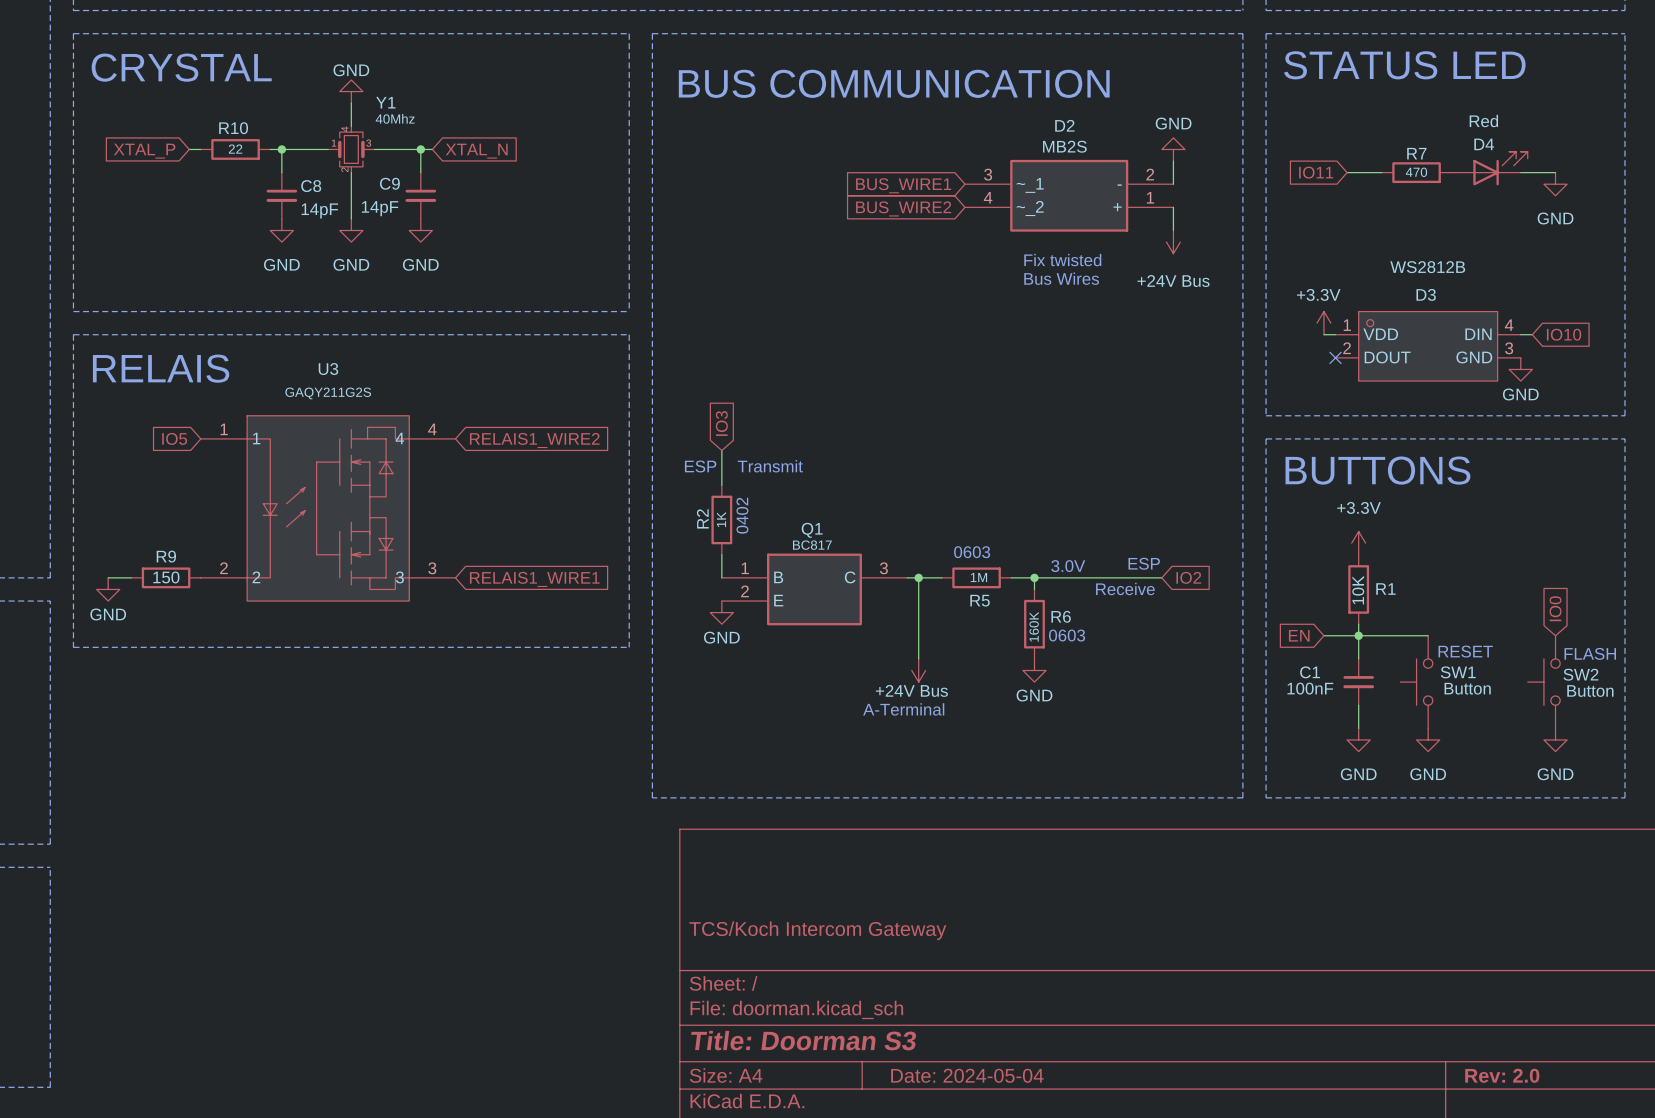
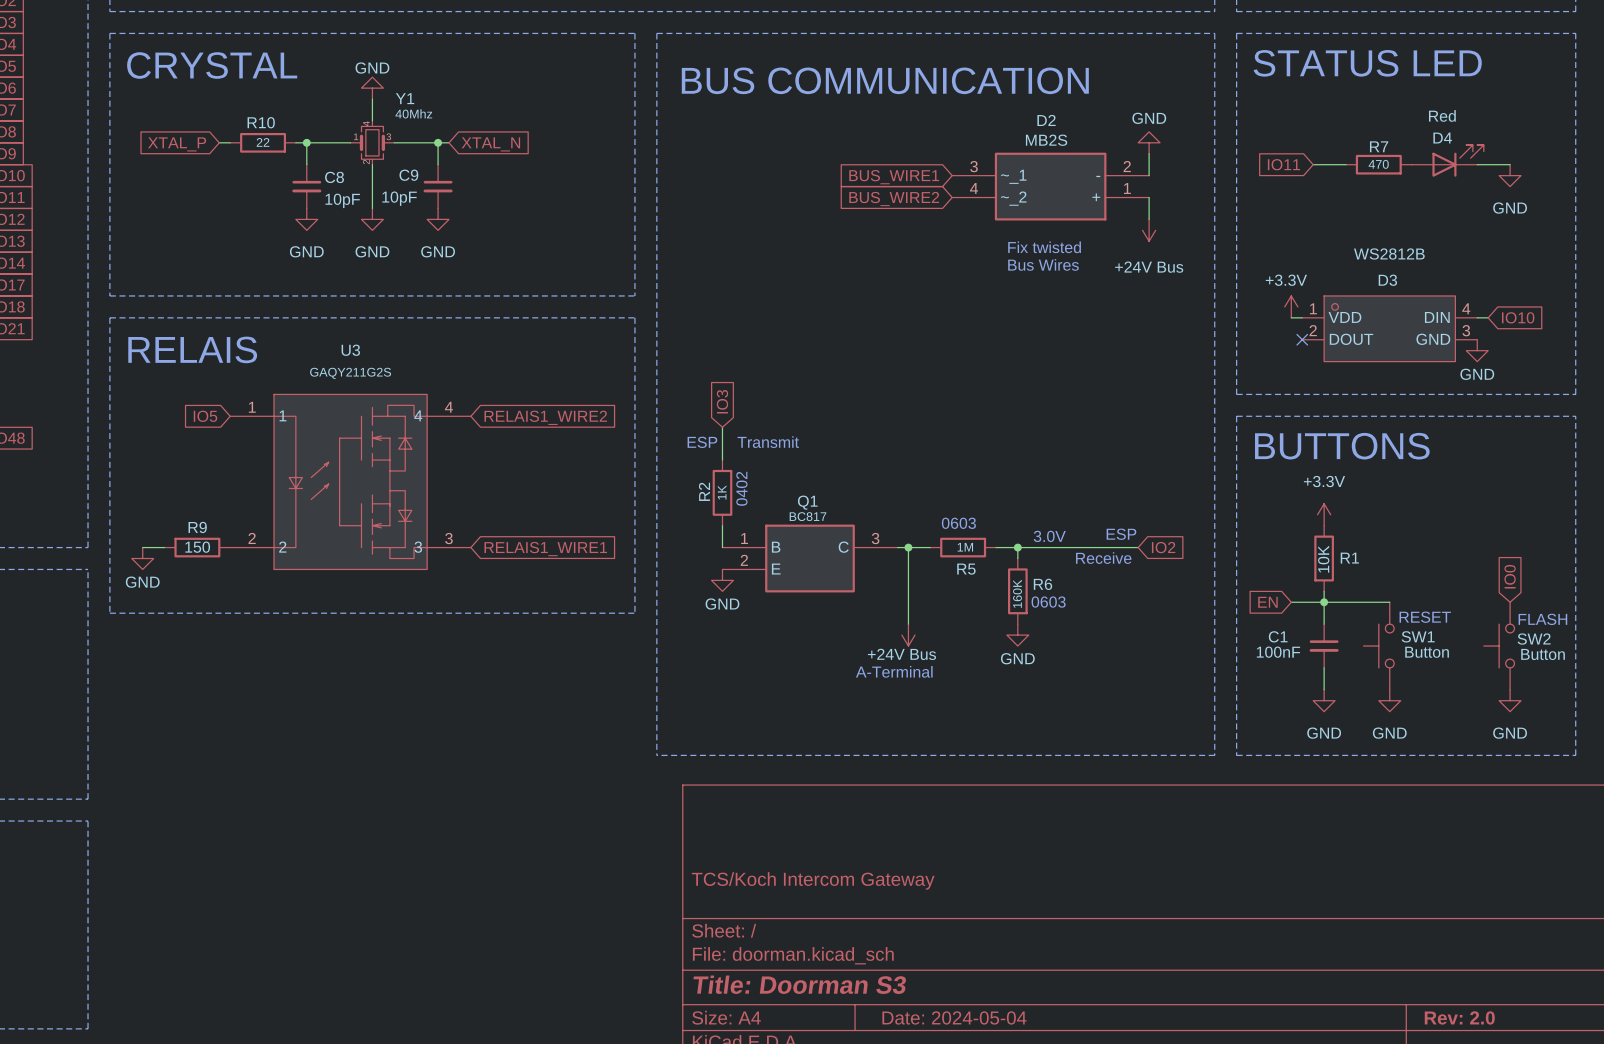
C9 value: 14pF (380, 208) -> 10pF (399, 198)
C8 value: 14pF (319, 210) -> 10pF (342, 200)

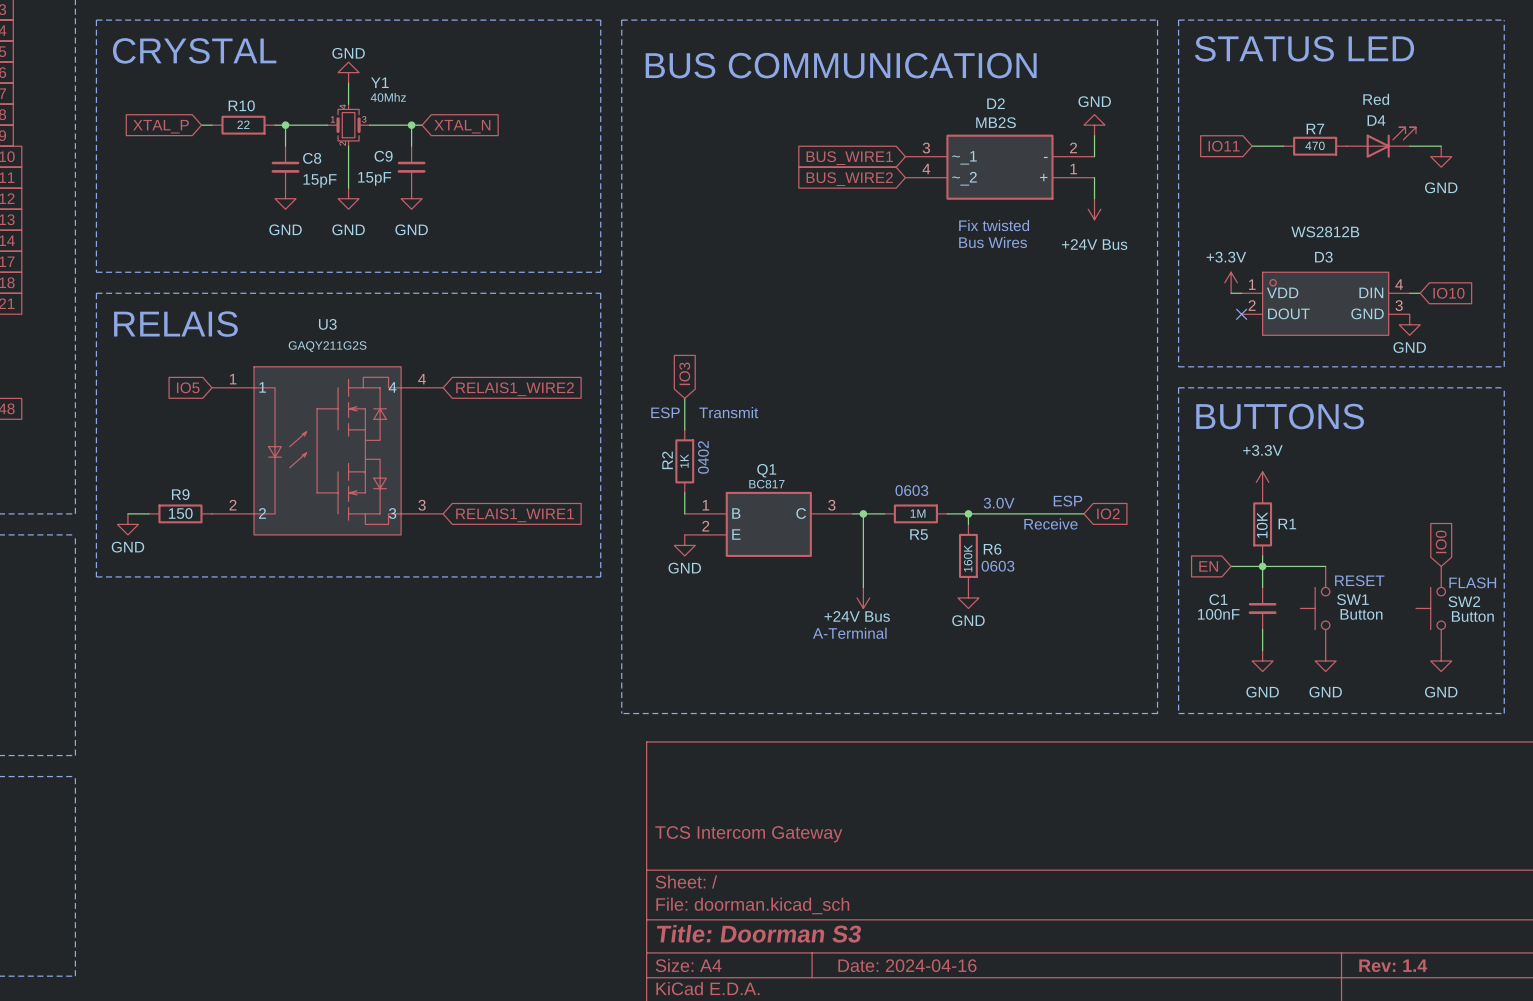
C9 value: 10pF (399, 198) -> 15pF (374, 178)
C8 value: 10pF (342, 200) -> 15pF (320, 181)
title block: TCS/Koch Intercom Gateway (813, 880) -> TCS Intercom Gateway (748, 834)
title block: Date: 2024-05-04 (954, 1017) -> Date: 2024-04-16 (907, 965)
title block: Rev: 2.0 (1459, 1017) -> Rev: 1.4 (1393, 965)

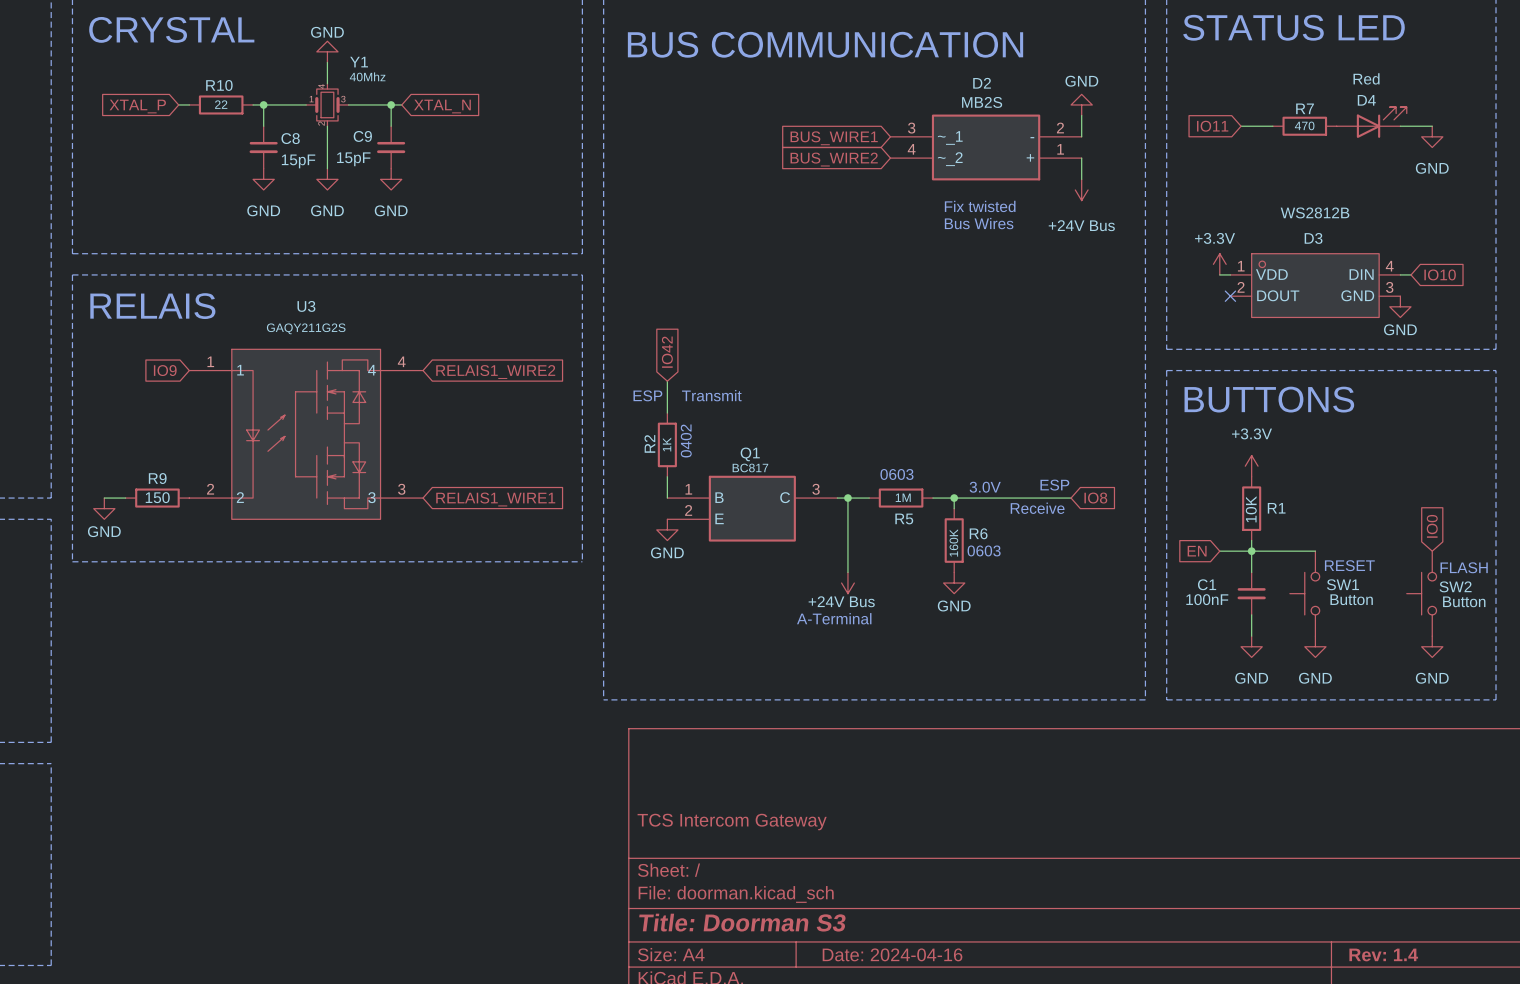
global label: IO3 (684, 373) -> IO42 (667, 352)
global label: IO5 (188, 387) -> IO9 (165, 370)
global label: IO2 (1108, 513) -> IO8 (1095, 498)

